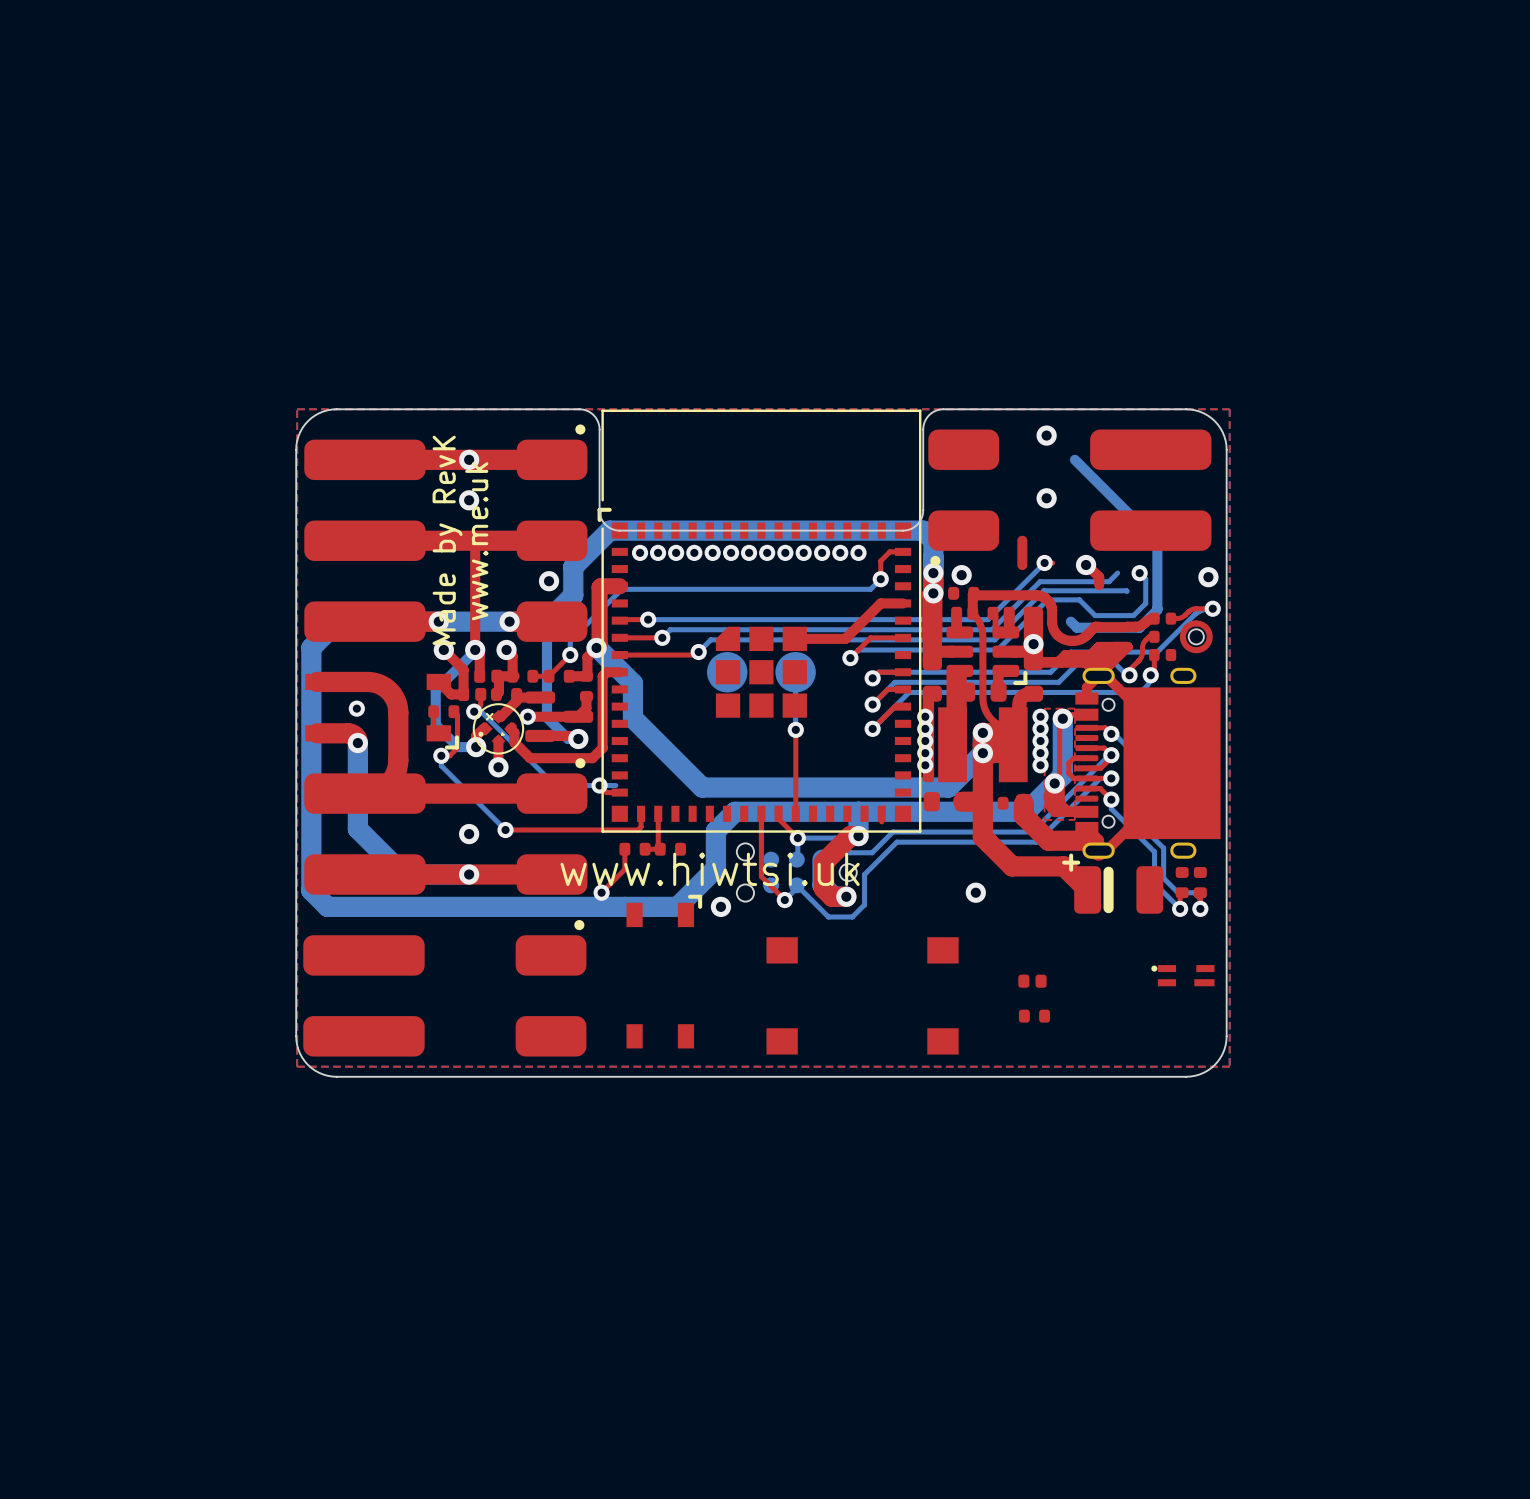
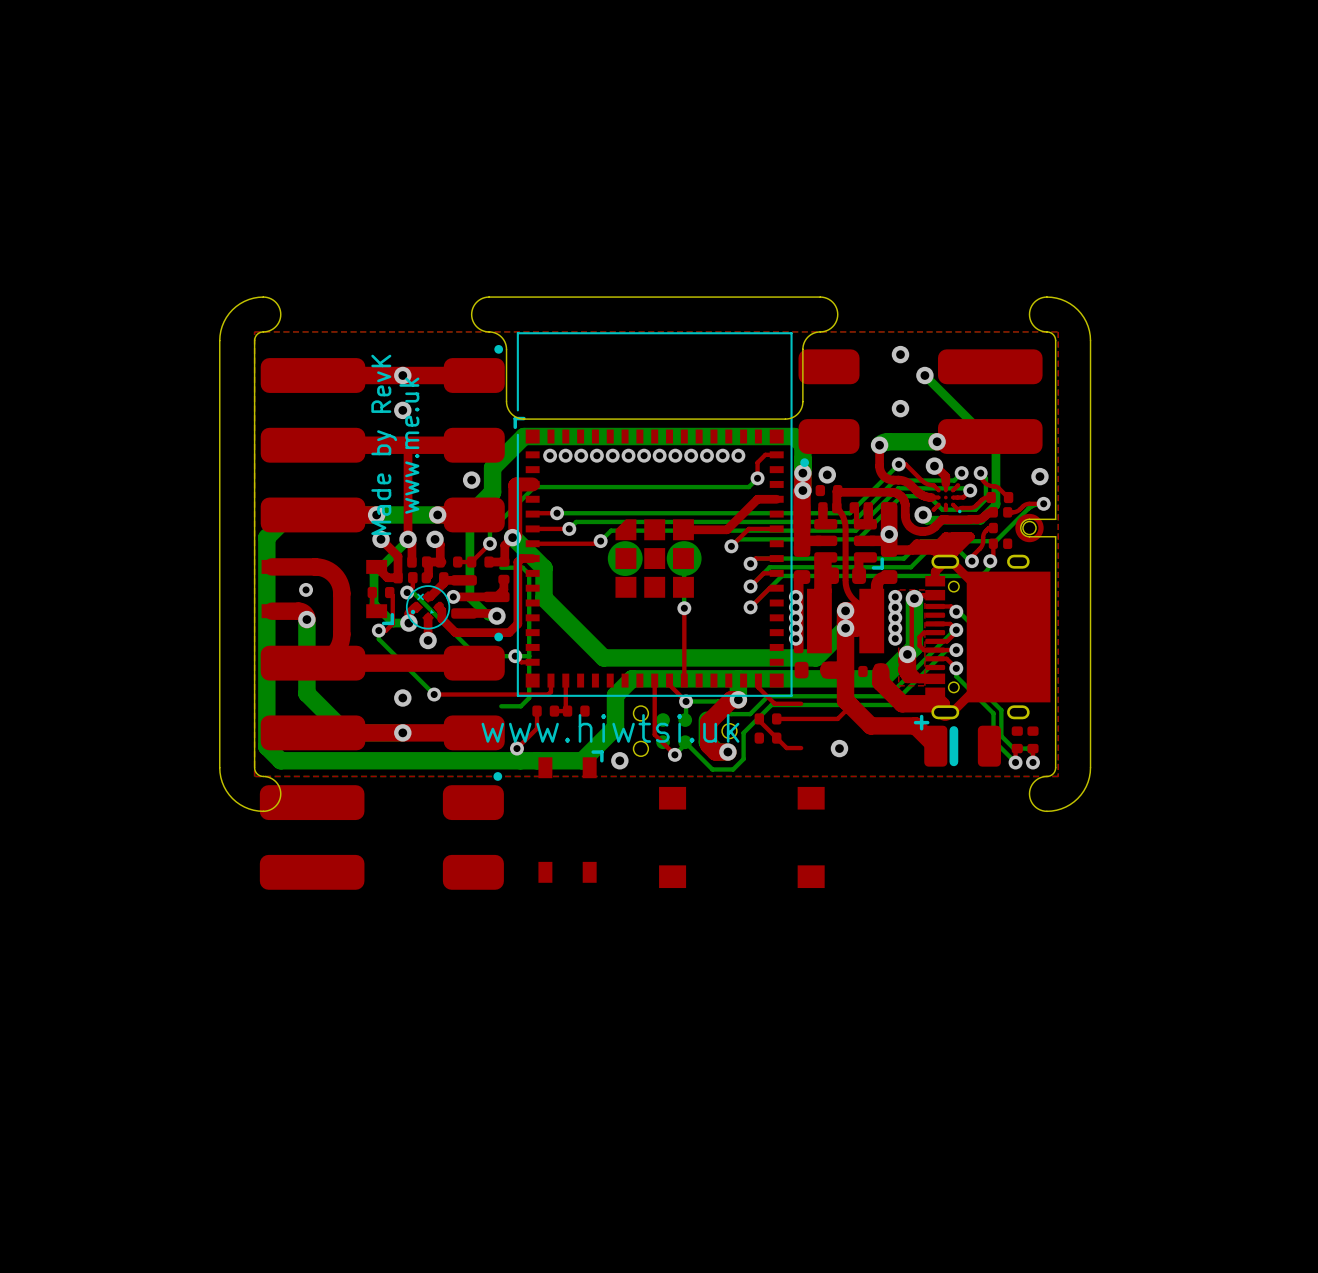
board edge: none -> (263, 297) (244, 301) (232, 309) (224, 321) (219, 340) (220, 772) (224, 786) (232, 798) (244, 807) (263, 811) (269, 810) (276, 805) (280, 793) (276, 782) (269, 777) (258, 774) (254, 767) (254, 340) (258, 333) (269, 330) (276, 326) (280, 314) (276, 302) (269, 298) (263, 297)
board edge: none -> (489, 297) (820, 297) (832, 302) (837, 314) (836, 321) (830, 328) (812, 333) (804, 341) (802, 405) (797, 413) (791, 418) (523, 419) (513, 415) (506, 405) (504, 341) (496, 333) (479, 328) (472, 318) (472, 310) (476, 302) (480, 299) (489, 297)
board edge: (1226, 449) (1224, 436) (1217, 424) (1203, 413) (1190, 409) (941, 409) (930, 413) (923, 425) (923, 512) (918, 523) (909, 529) (619, 530) (607, 526) (600, 514) (599, 427) (595, 416) (586, 410) (336, 409) (327, 410) (315, 415) (302, 428) (298, 436) (296, 449) (296, 1040) (302, 1057) (311, 1067) (323, 1074) (336, 1076) (1190, 1076) (1203, 1072) (1214, 1064) (1220, 1057) (1225, 1045) (1226, 914) -> (1055, 366) (1054, 336) (1050, 332) (1036, 328) (1029, 316) (1033, 303) (1044, 297) (1061, 299) (1074, 306) (1086, 321) (1090, 335) (1090, 767) (1088, 782) (1077, 798) (1061, 808) (1042, 810) (1031, 802) (1030, 789) (1036, 780) (1051, 775) (1055, 767)
via: none -> (924, 375)
bottom track: none -> (937, 441) (886, 441) (879, 445)
via: none -> (937, 441)
via: none -> (879, 445)
top track: none -> (905, 464) (923, 481) (933, 485)
top track: none -> (879, 466) (881, 473) (886, 478) (905, 481) (921, 495) (931, 497)
via: none -> (961, 473)
top track: none -> (980, 473) (985, 483) (997, 487) (1008, 497)
top track: none -> (970, 490) (963, 497) (958, 497)
via: none -> (970, 490)
top track: none -> (991, 497) (983, 498) (973, 507) (958, 509)
part: none -> (999, 497)
part: none -> (946, 498)
via: none -> (923, 514)
board edge: (1226, 626) (1226, 646) -> (1055, 519) (1027, 519) (1022, 522) (1020, 528) (1022, 533) (1027, 536) (1055, 536)
bottom track: none -> (501, 567) (522, 567) (529, 574) (529, 698) (520, 706) (501, 706)
top track: none -> (758, 687) (774, 703) (801, 703)
top track: none -> (850, 705) (837, 718) (776, 718)
top track: none -> (759, 720) (786, 748) (801, 748)
part: none -> (768, 738)
top zone outline: (297, 925) (297, 1066) (1229, 1066) (1229, 925) -> (254, 776) (1058, 776)
part: (1182, 975) -> none
part: (1032, 981) -> none
part position: (1034, 1016) -> (768, 718)

